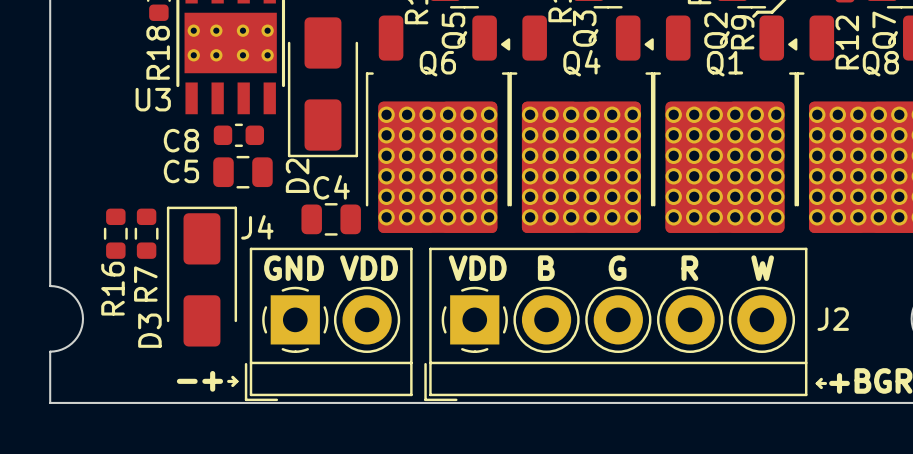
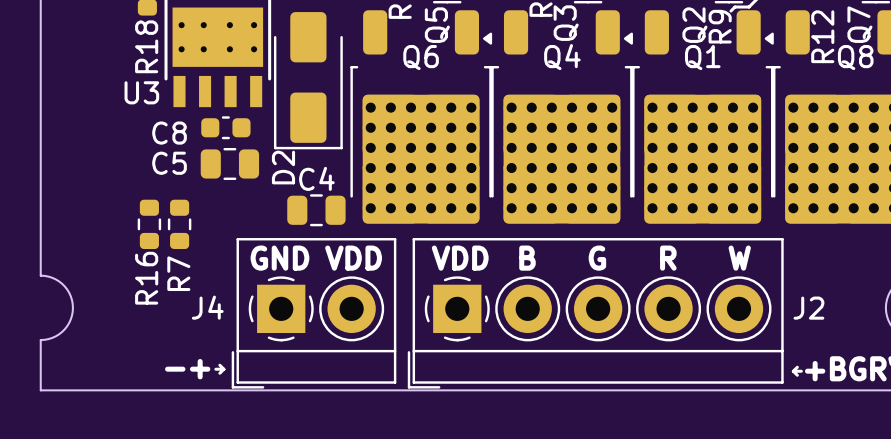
J4 name position: J4 (257, 227) -> J4 (207, 307)
R16 position: (115, 233) -> (149, 224)
R7 position: (146, 233) -> (179, 224)
D3: (201, 276) -> none

